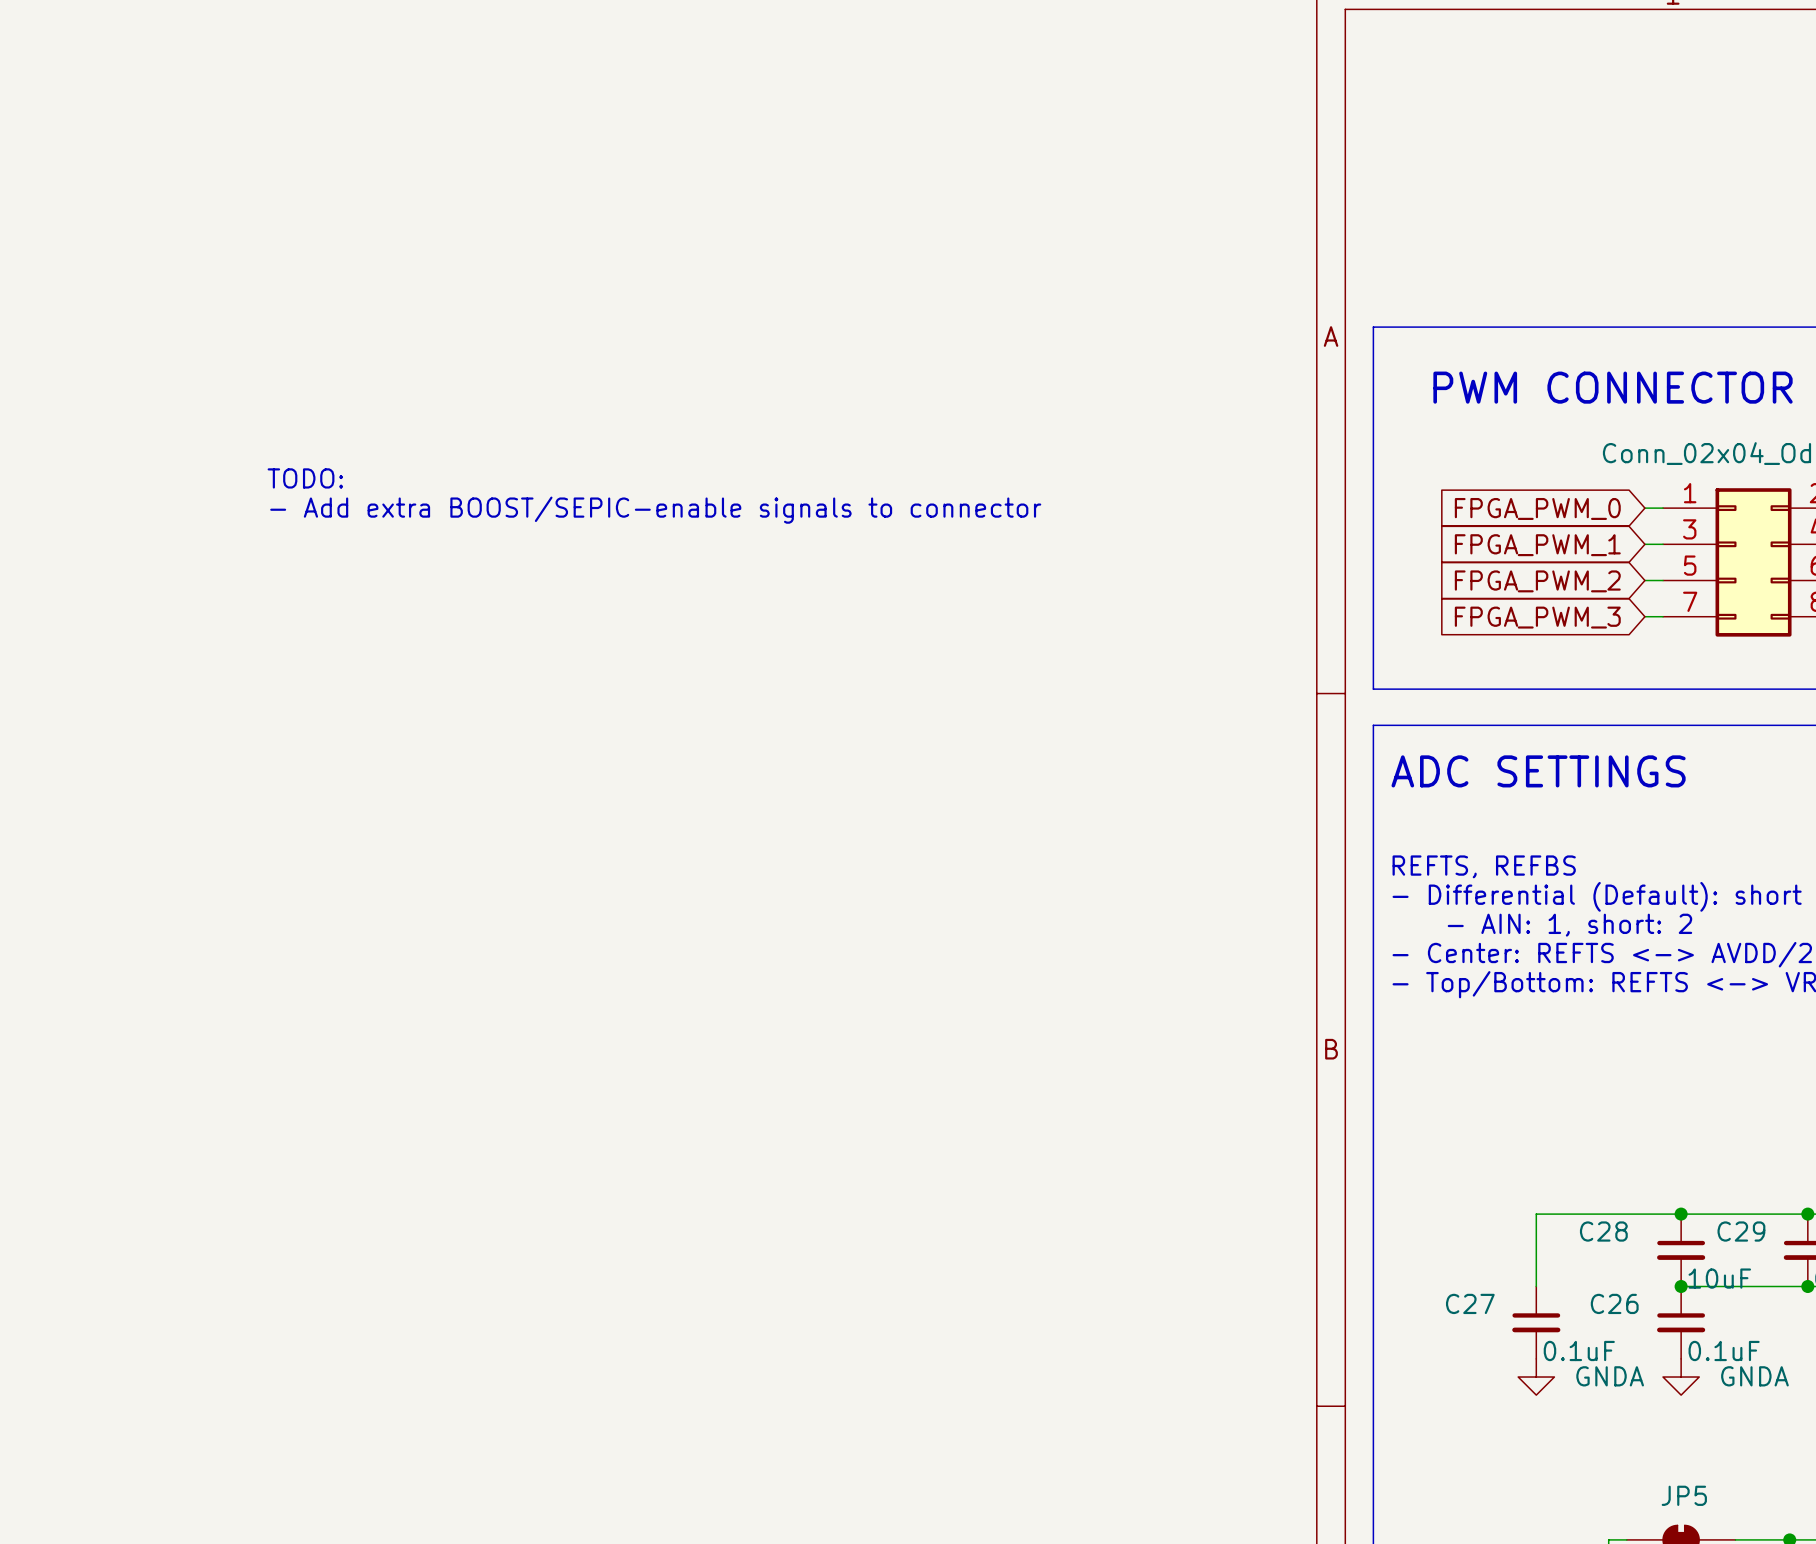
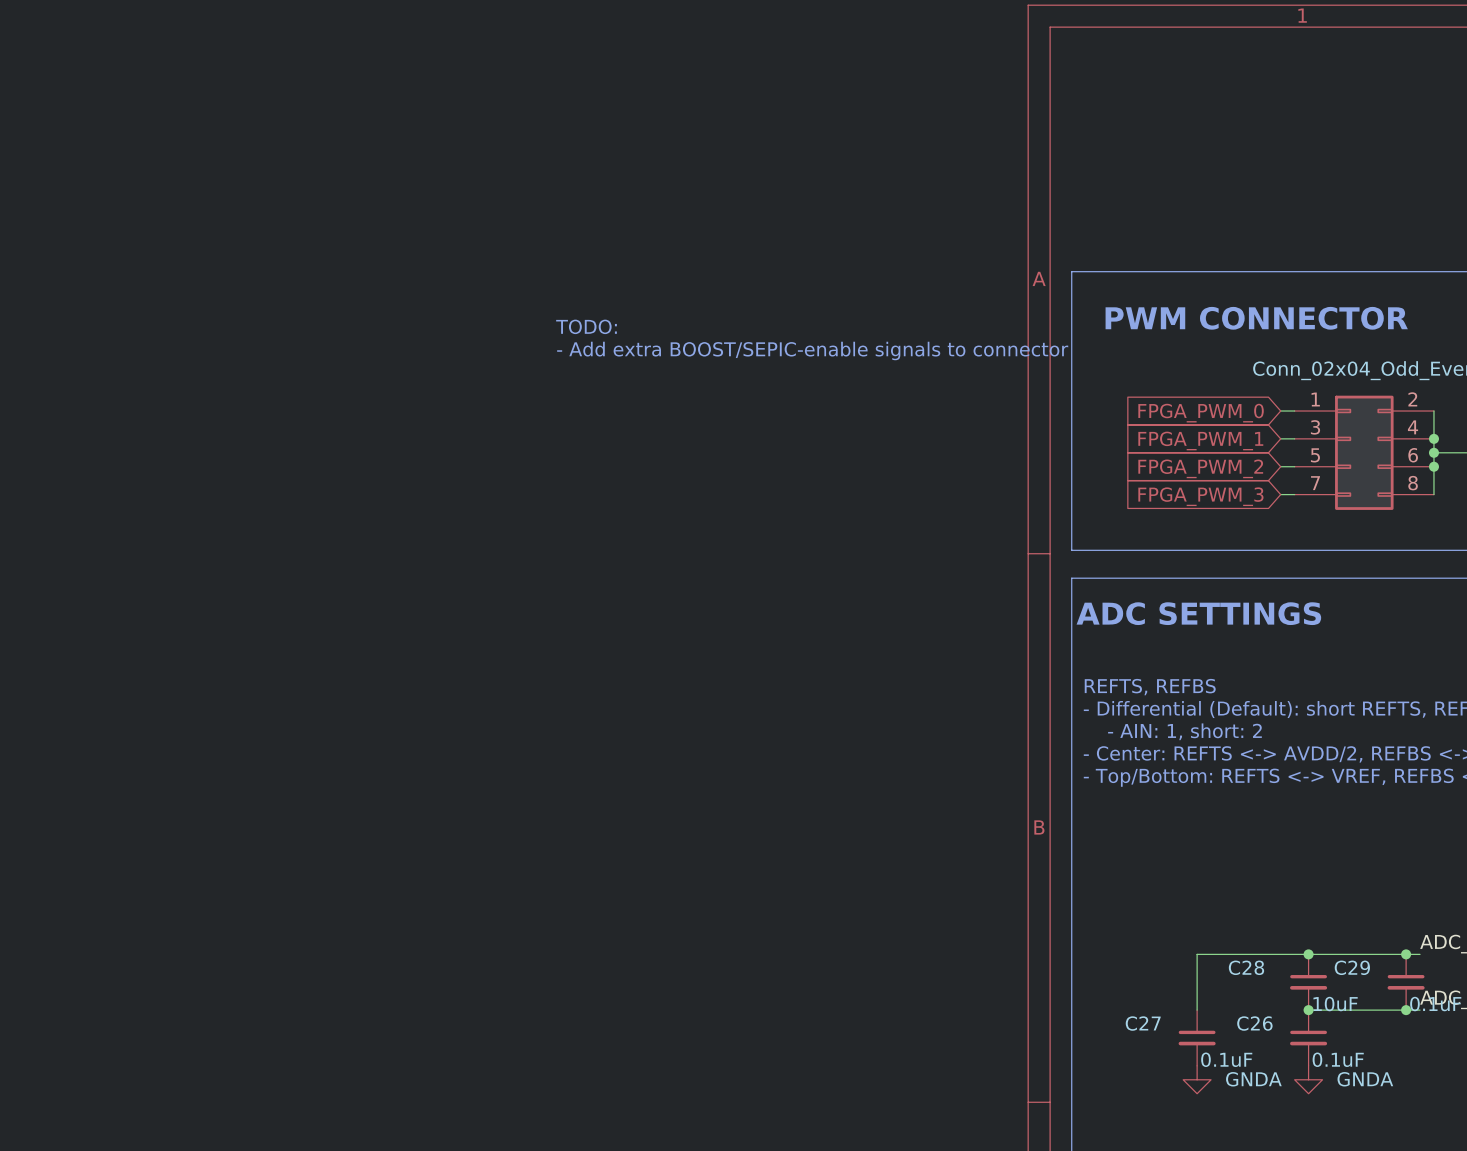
text: none -> TODO: (586, 326)
text: none -> - Add extra BOOST/SEPIC-enable signals to connector (812, 350)
text: TODO: (305, 478) -> none
text: - Add extra BOOST/SEPIC-enable signals to connector (655, 510) -> none

